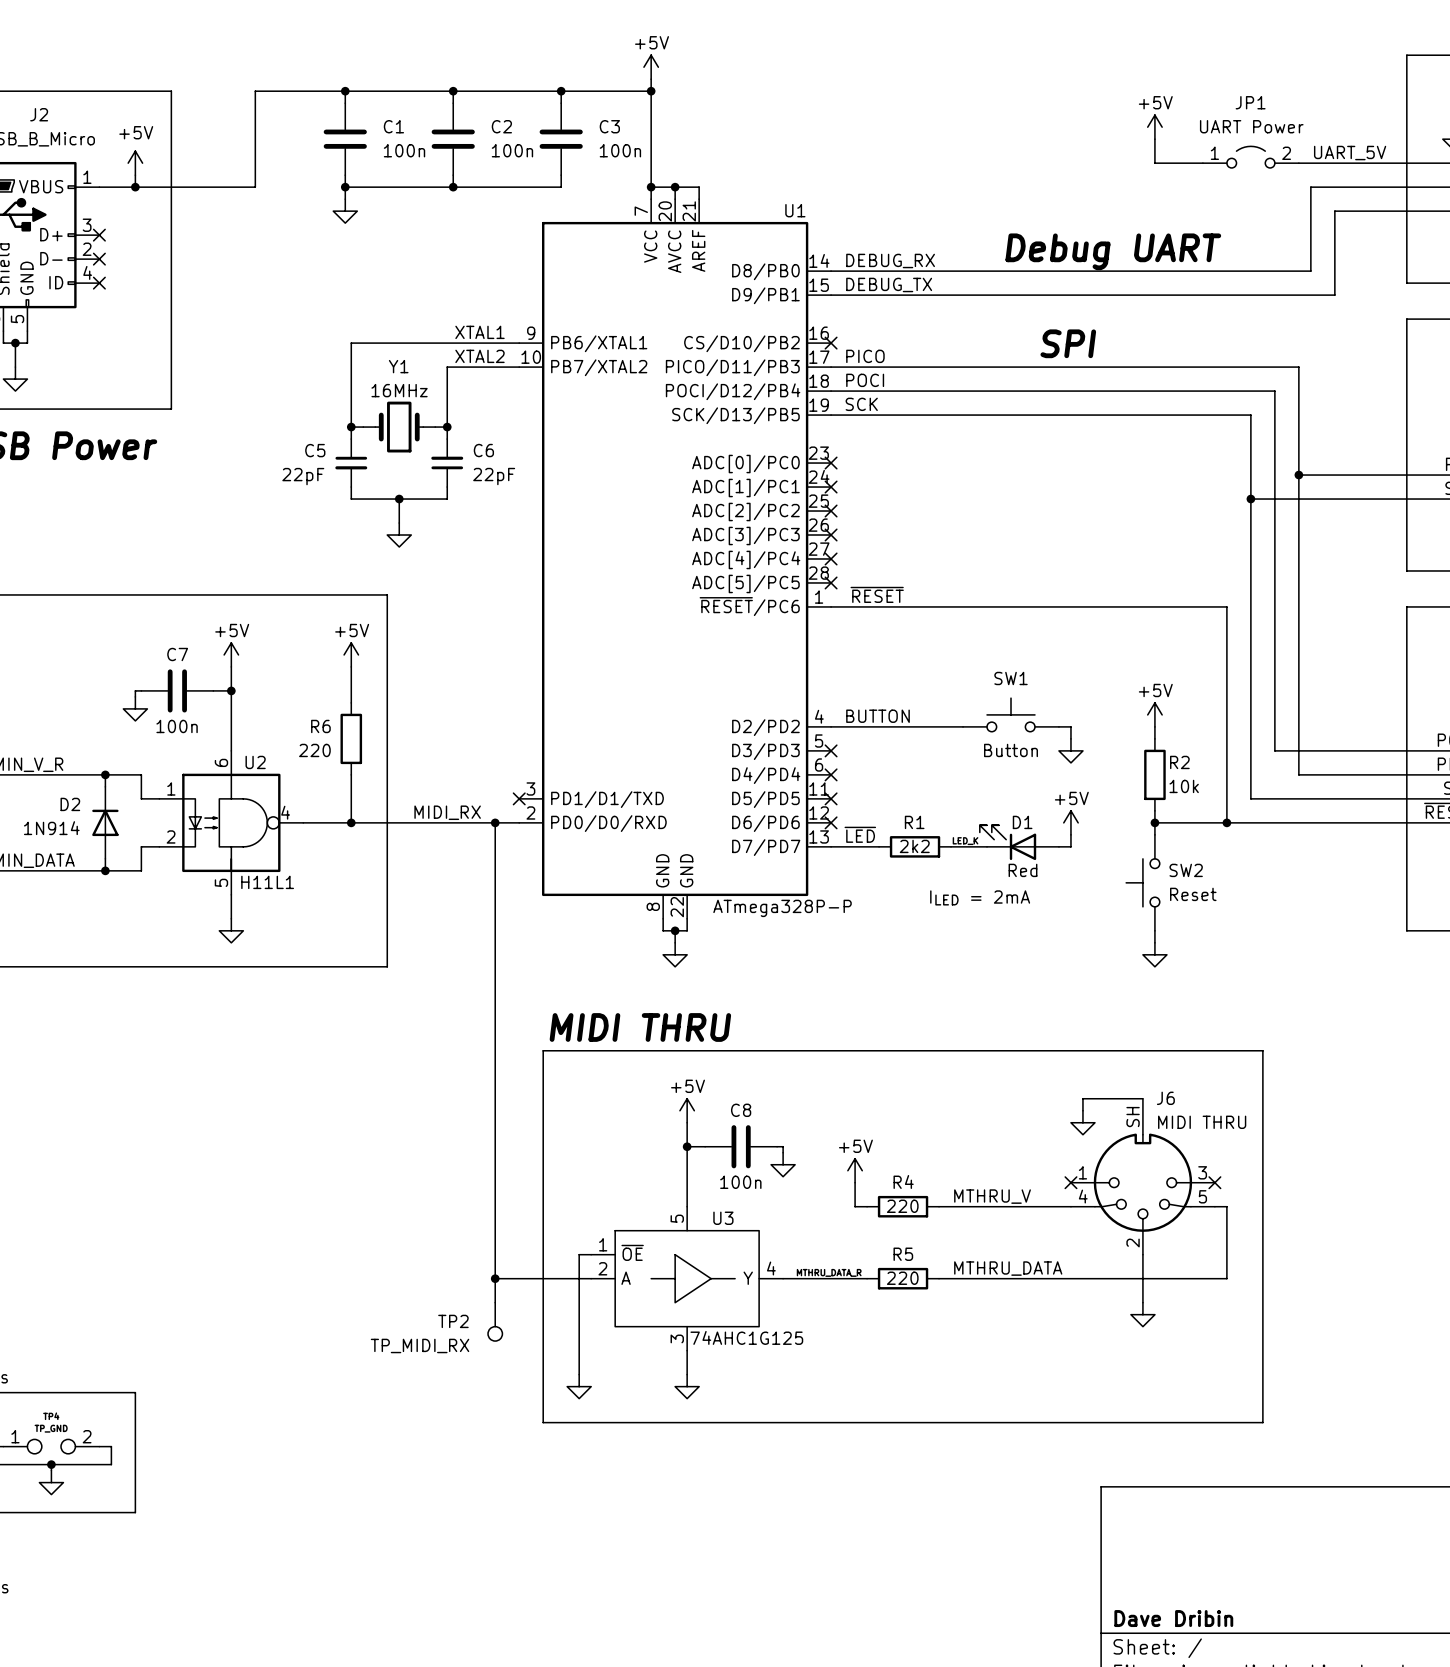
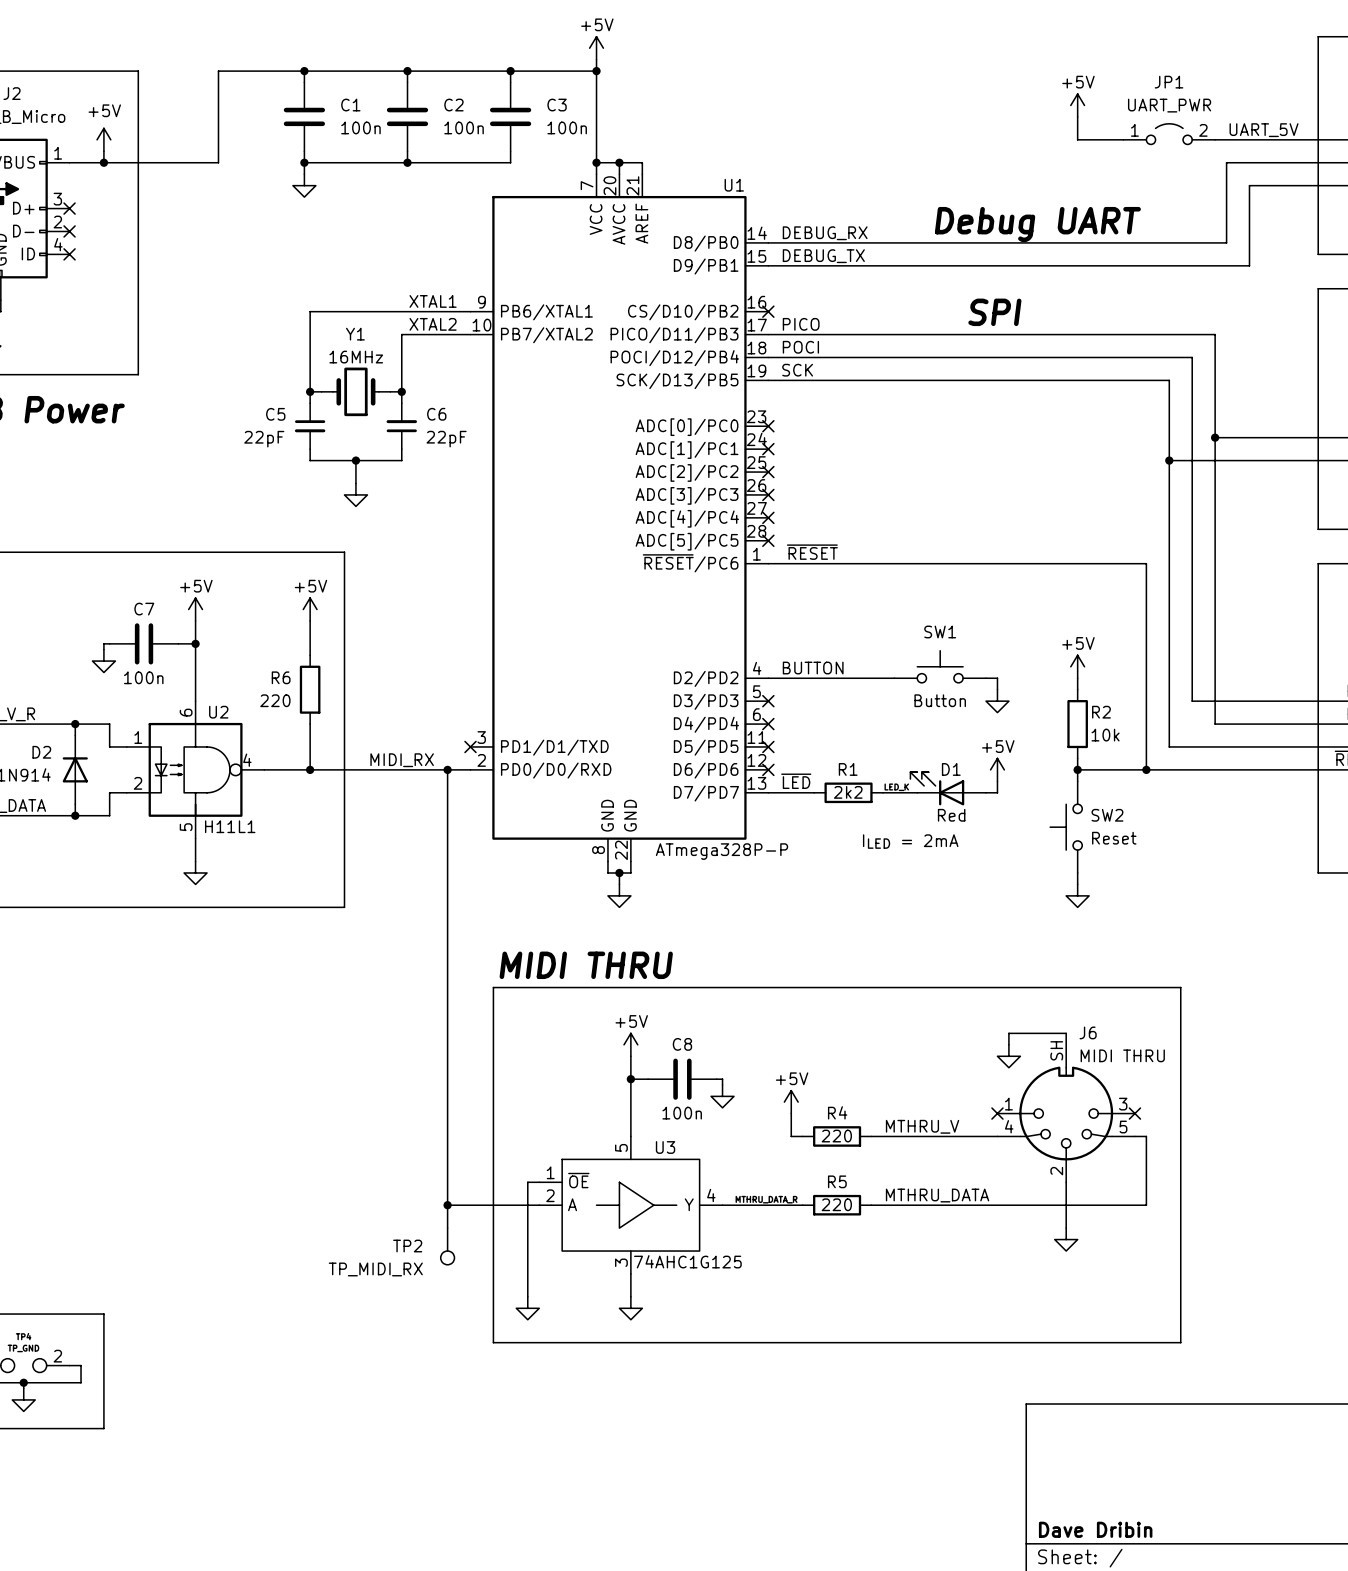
JP1 value: UART Power (1251, 126) -> UART_PWR (1169, 105)

